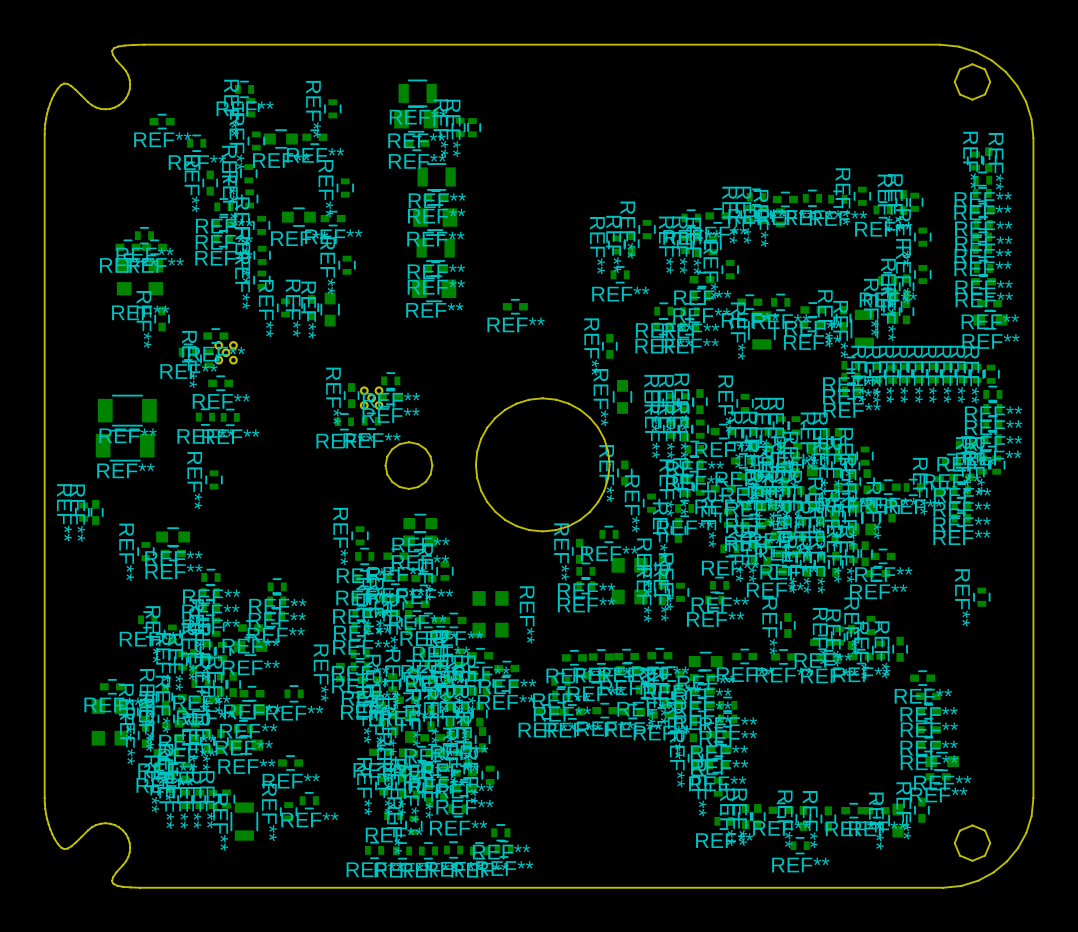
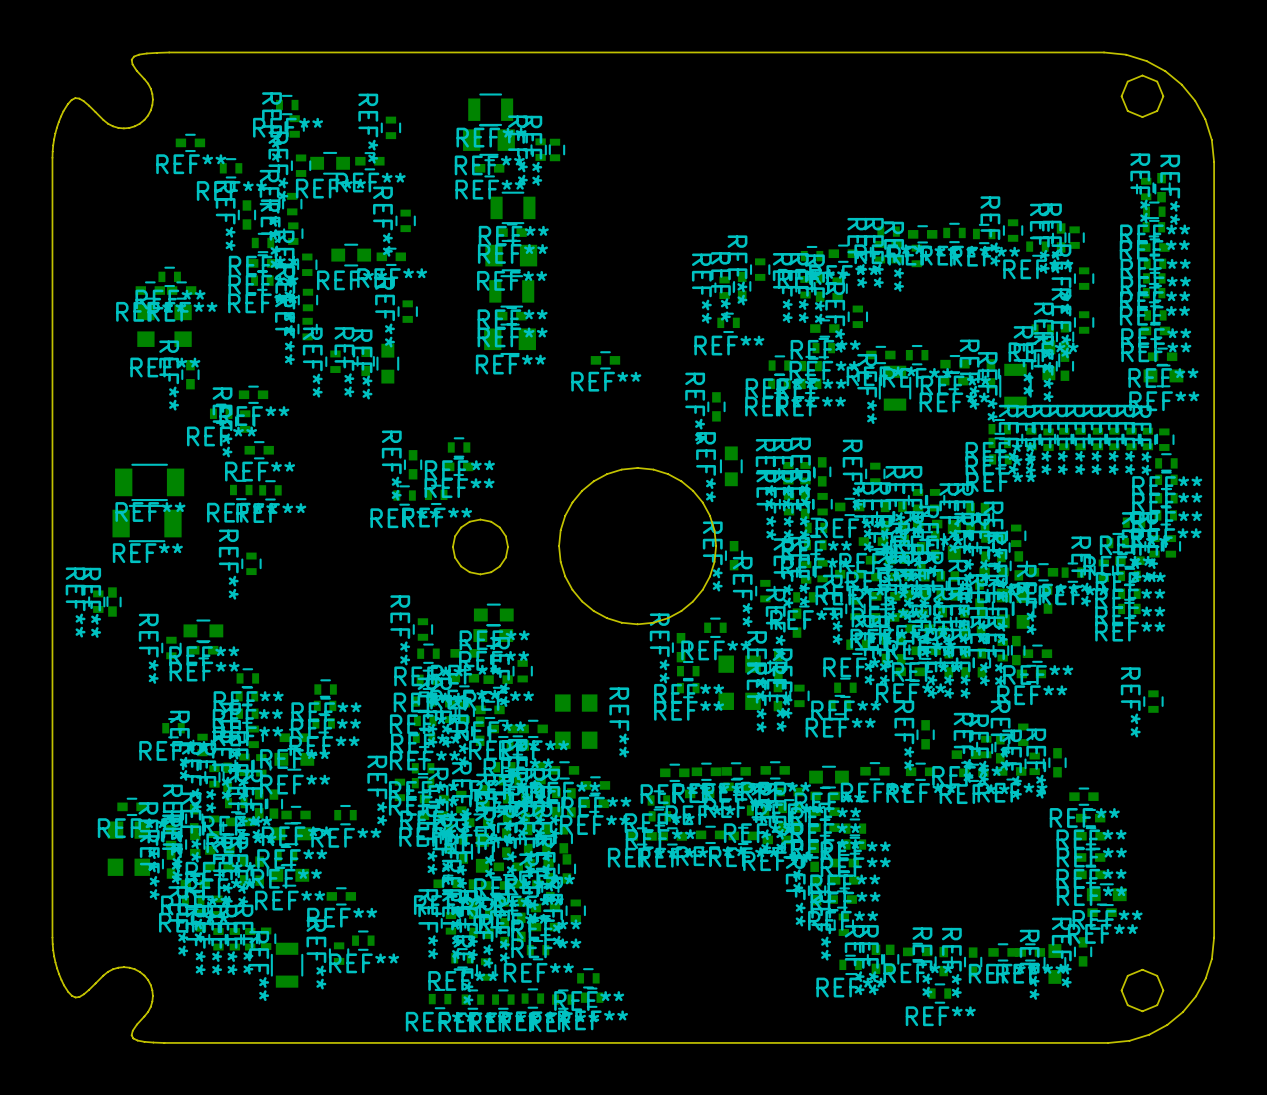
part: (226, 352) -> none
part: (371, 398) -> none

